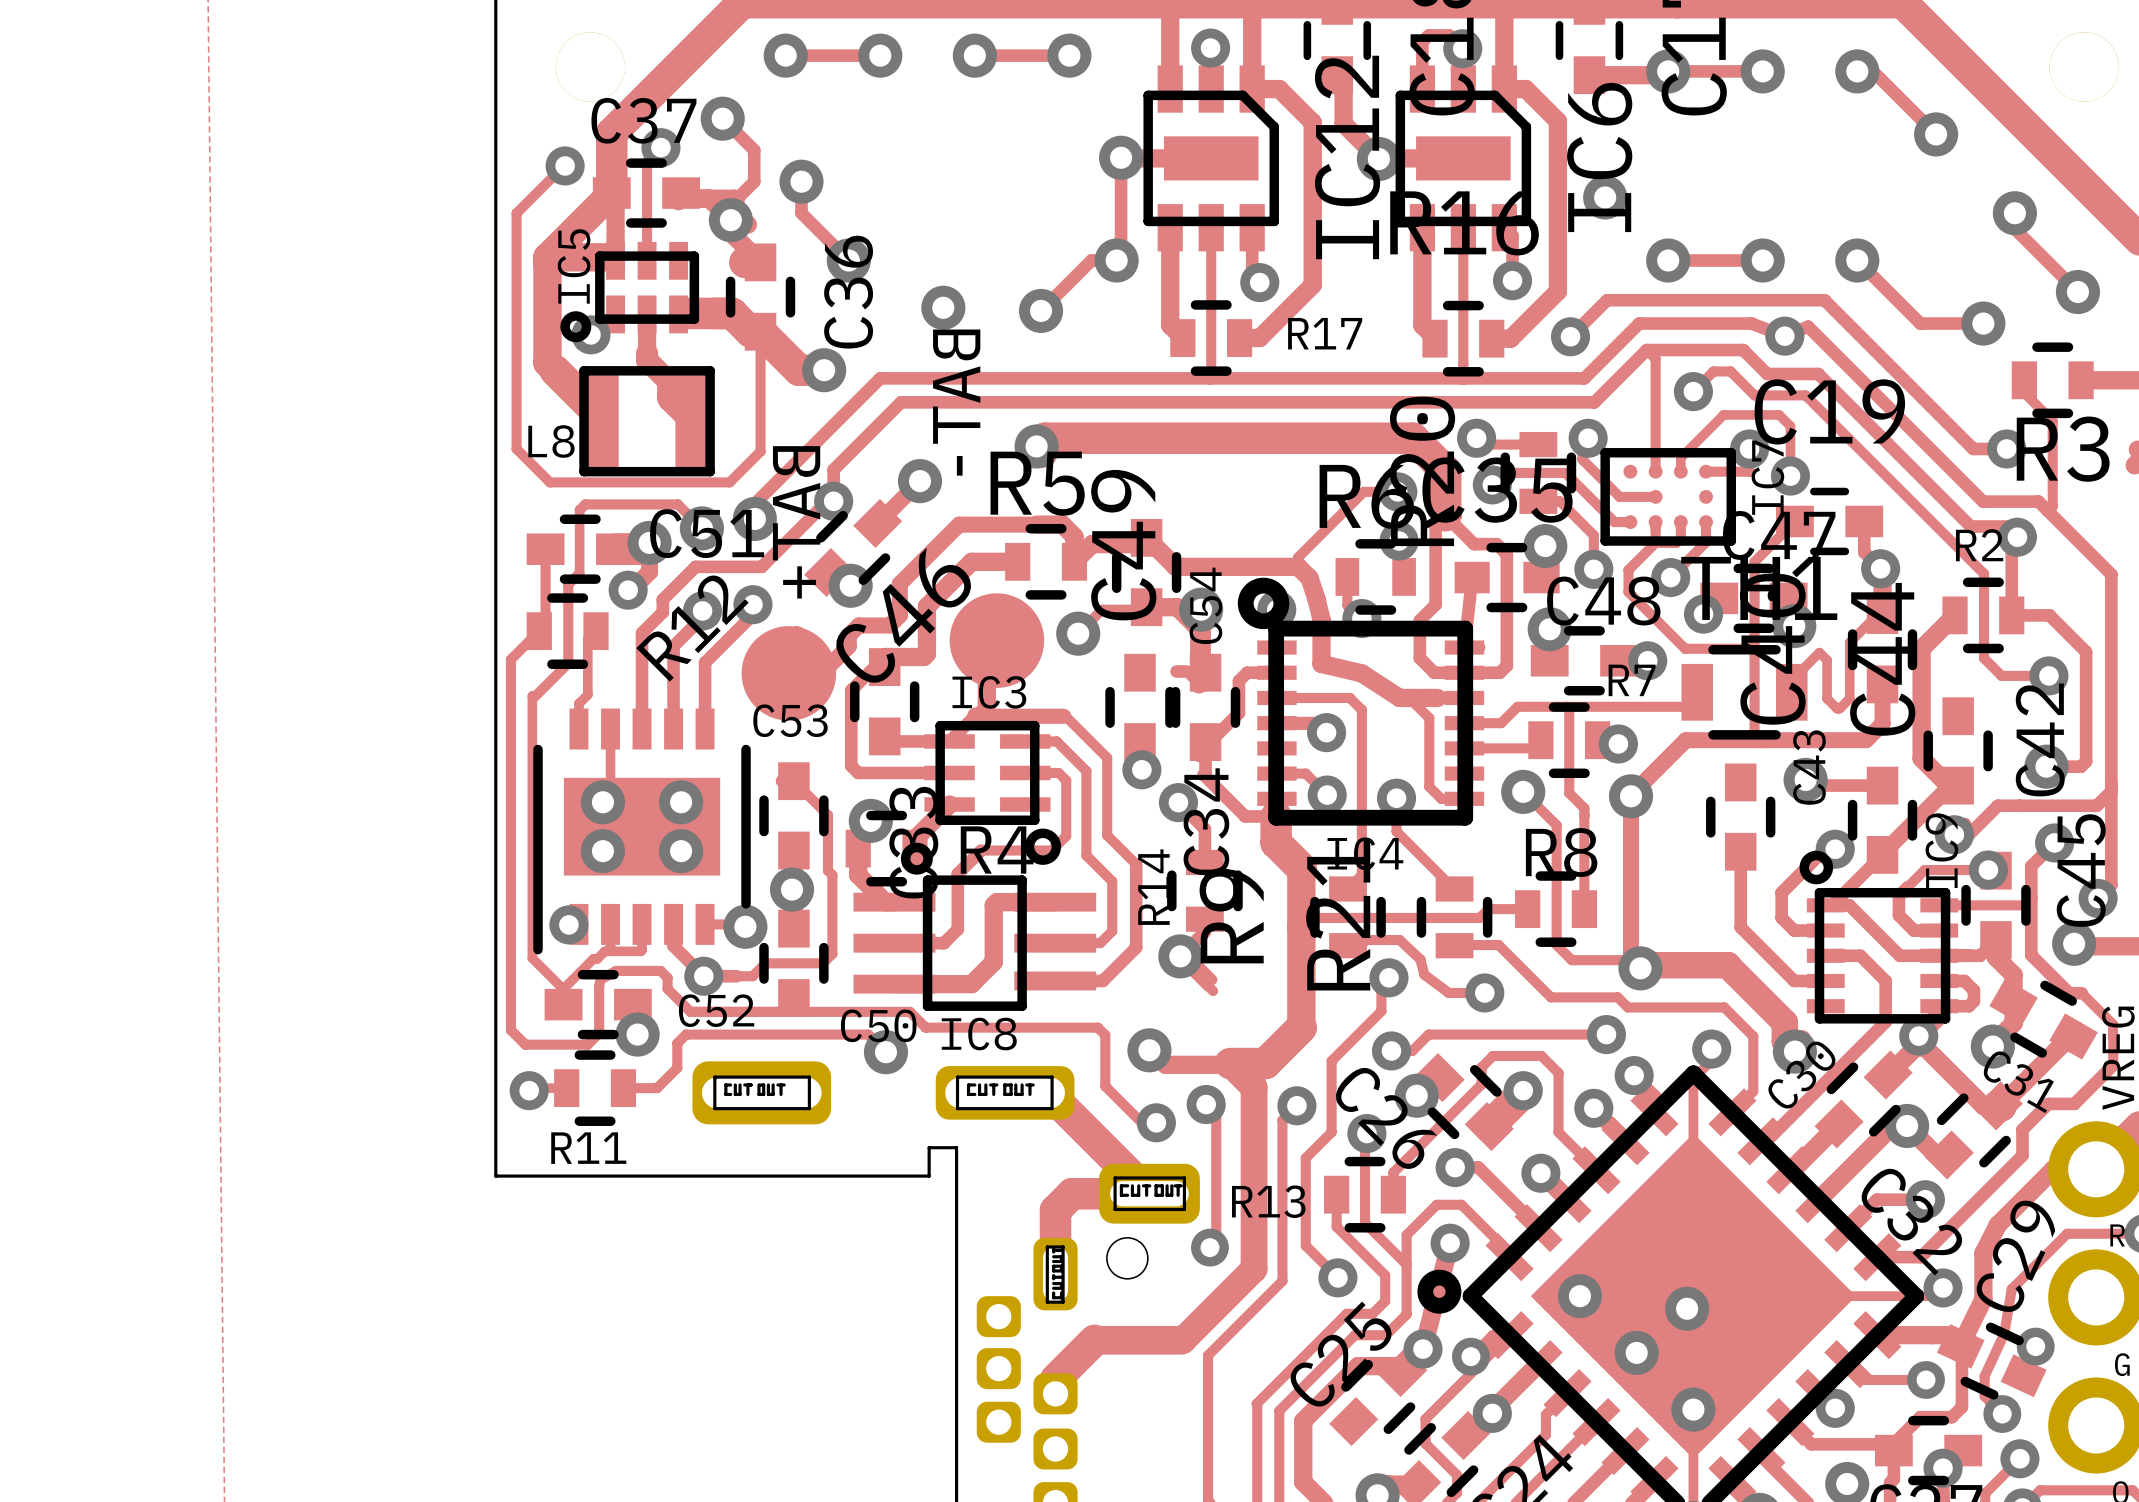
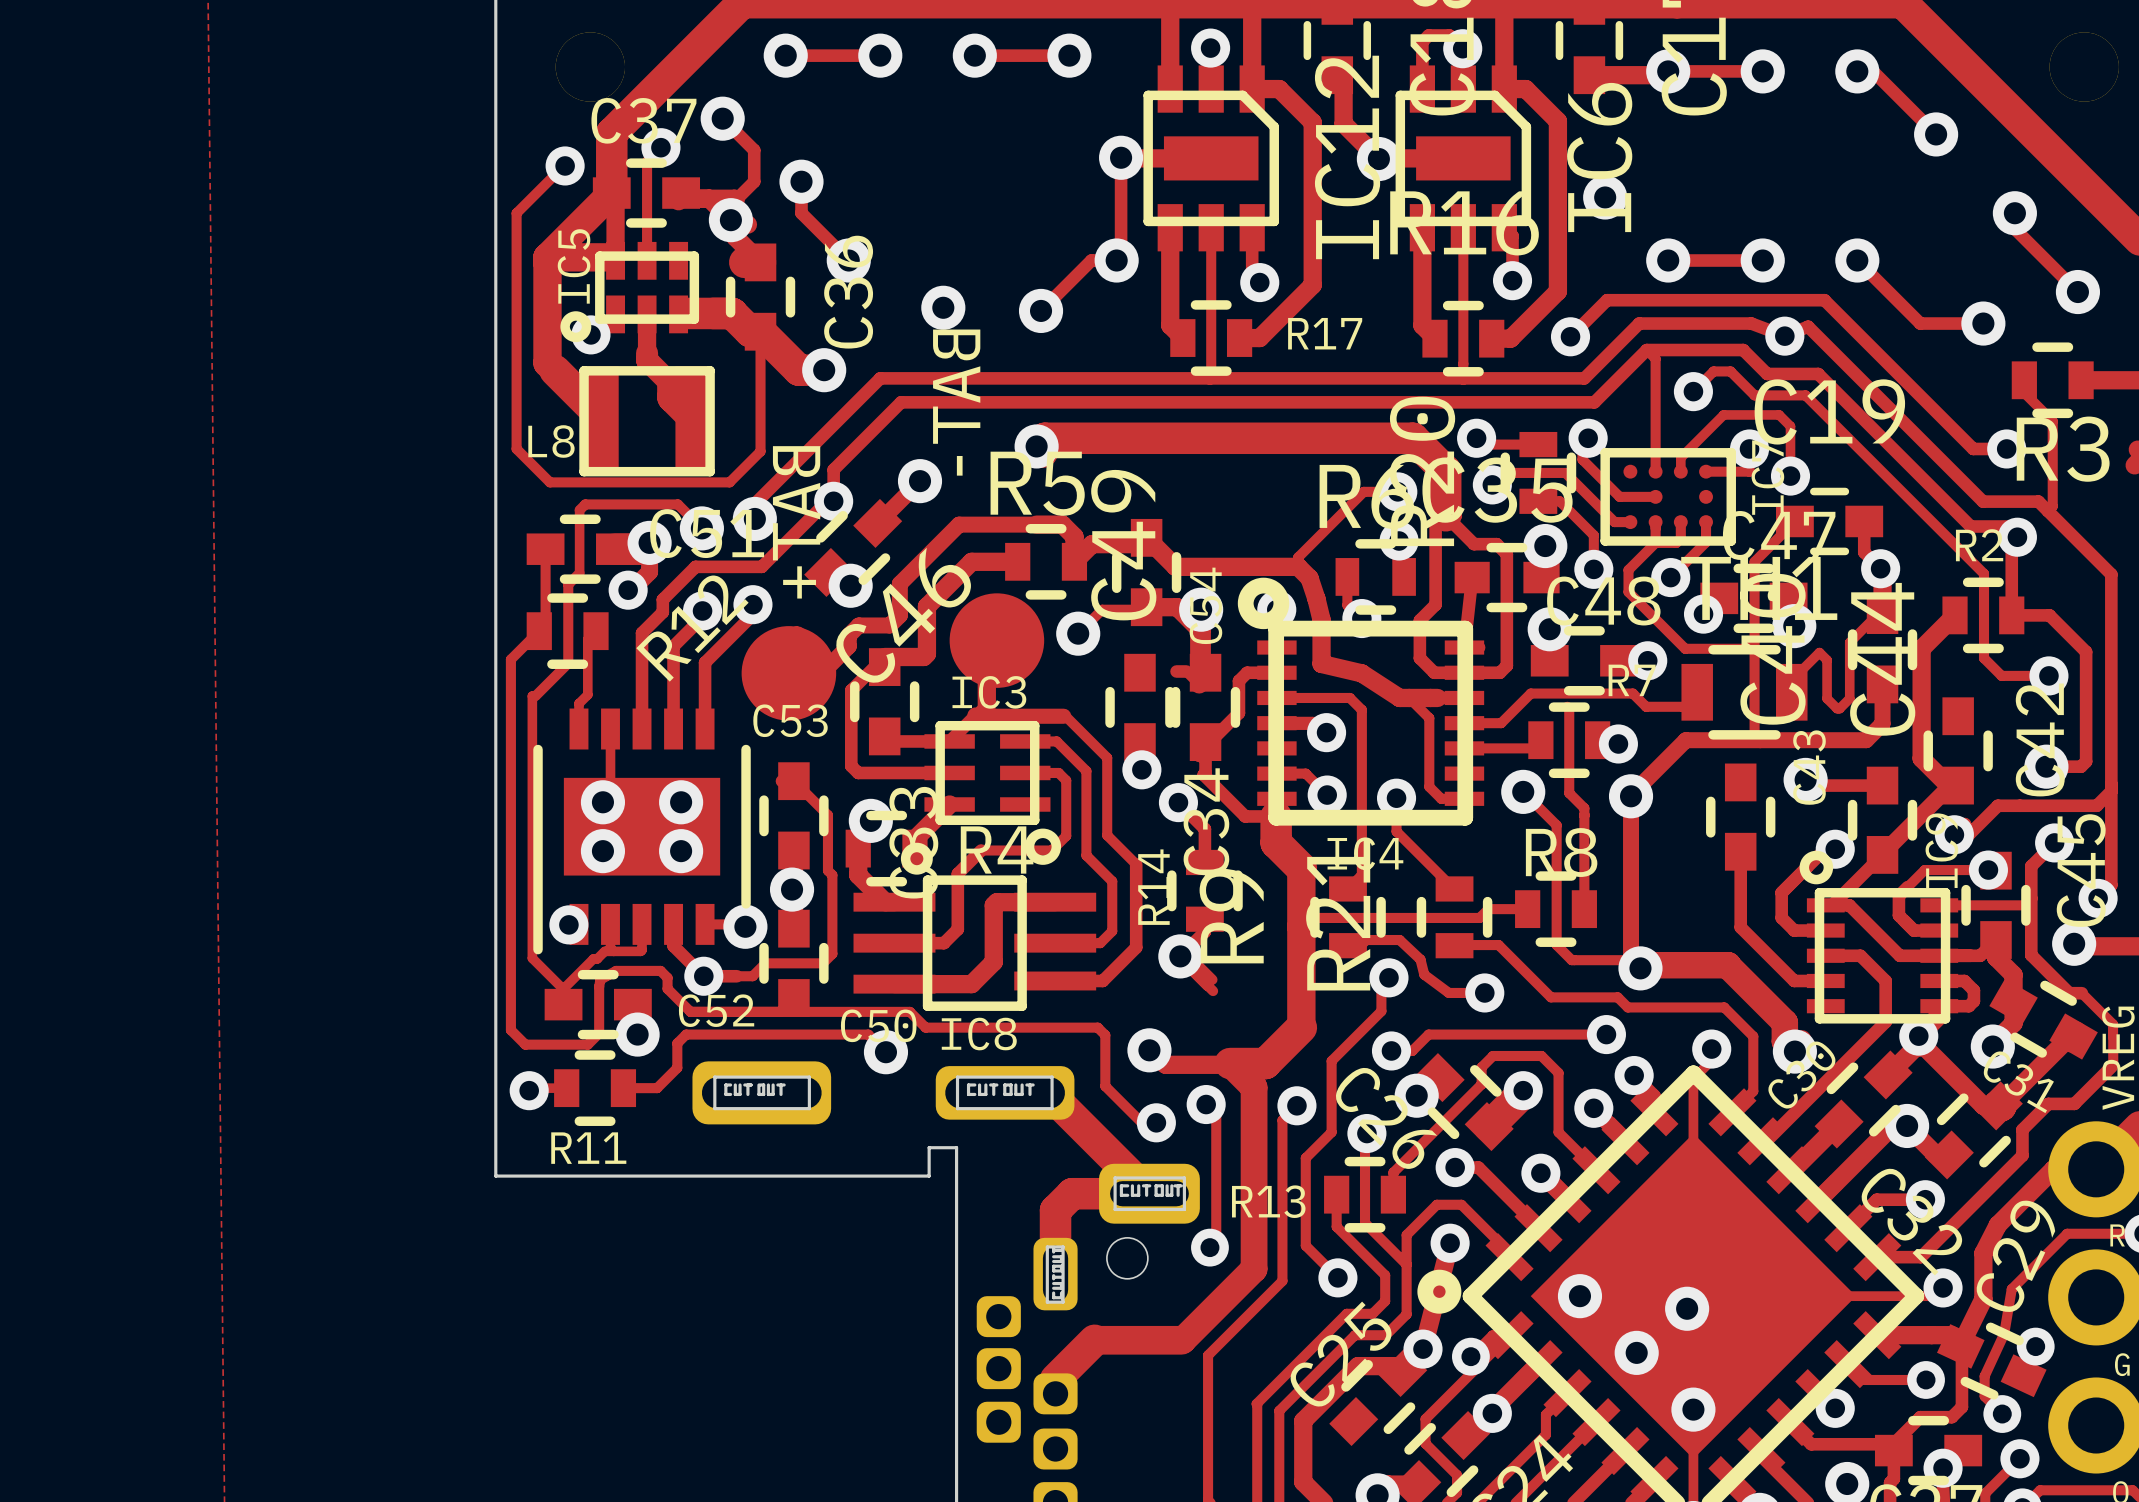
track: (1517, 706) (1646, 706) -> (1517, 706) (1530, 693) (1632, 693) (1646, 706)

